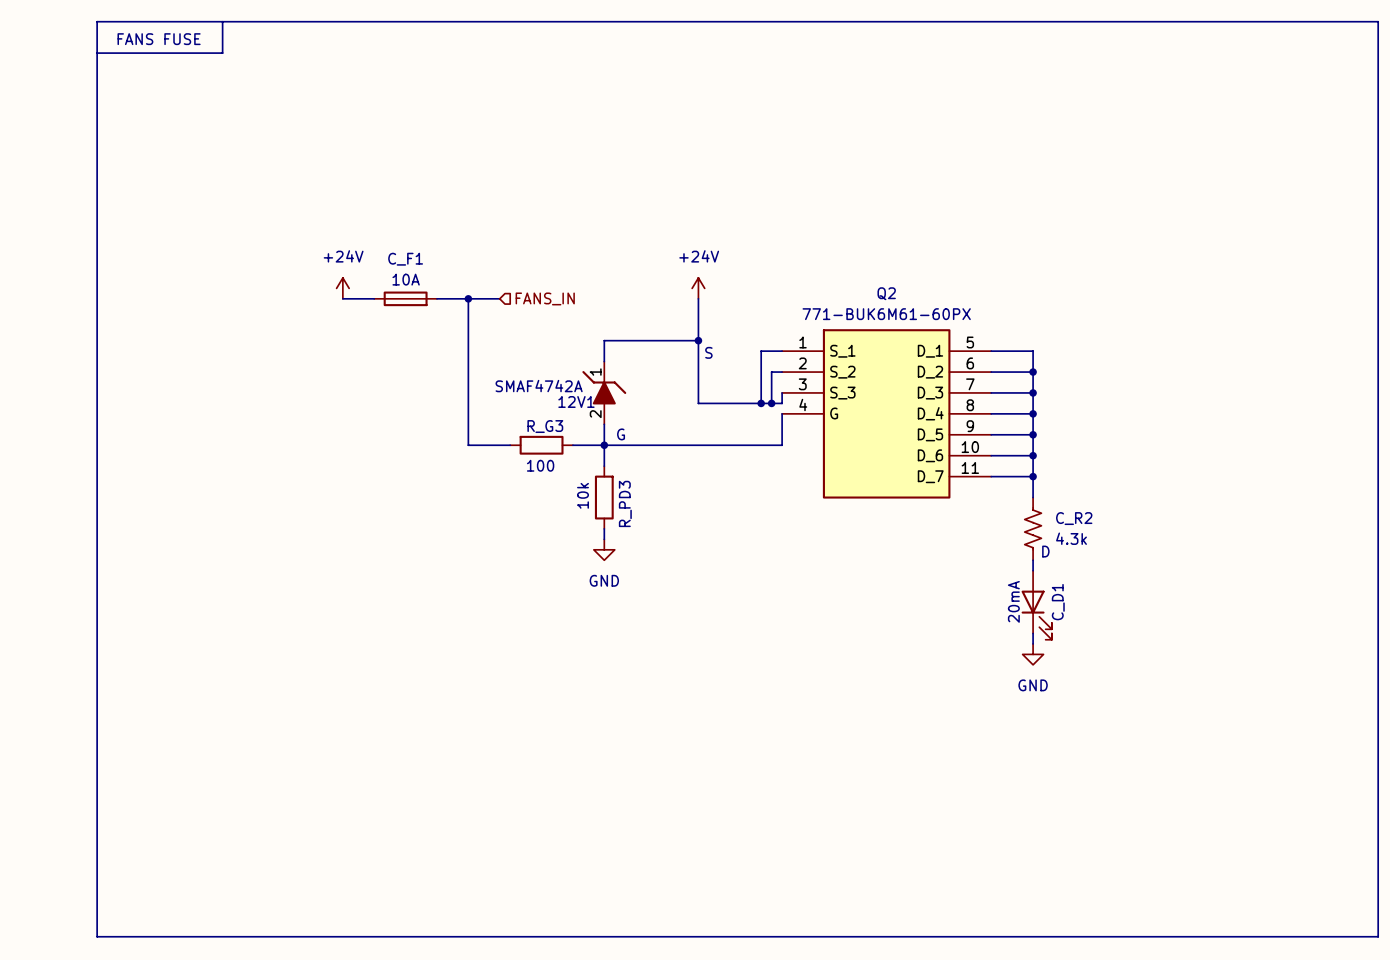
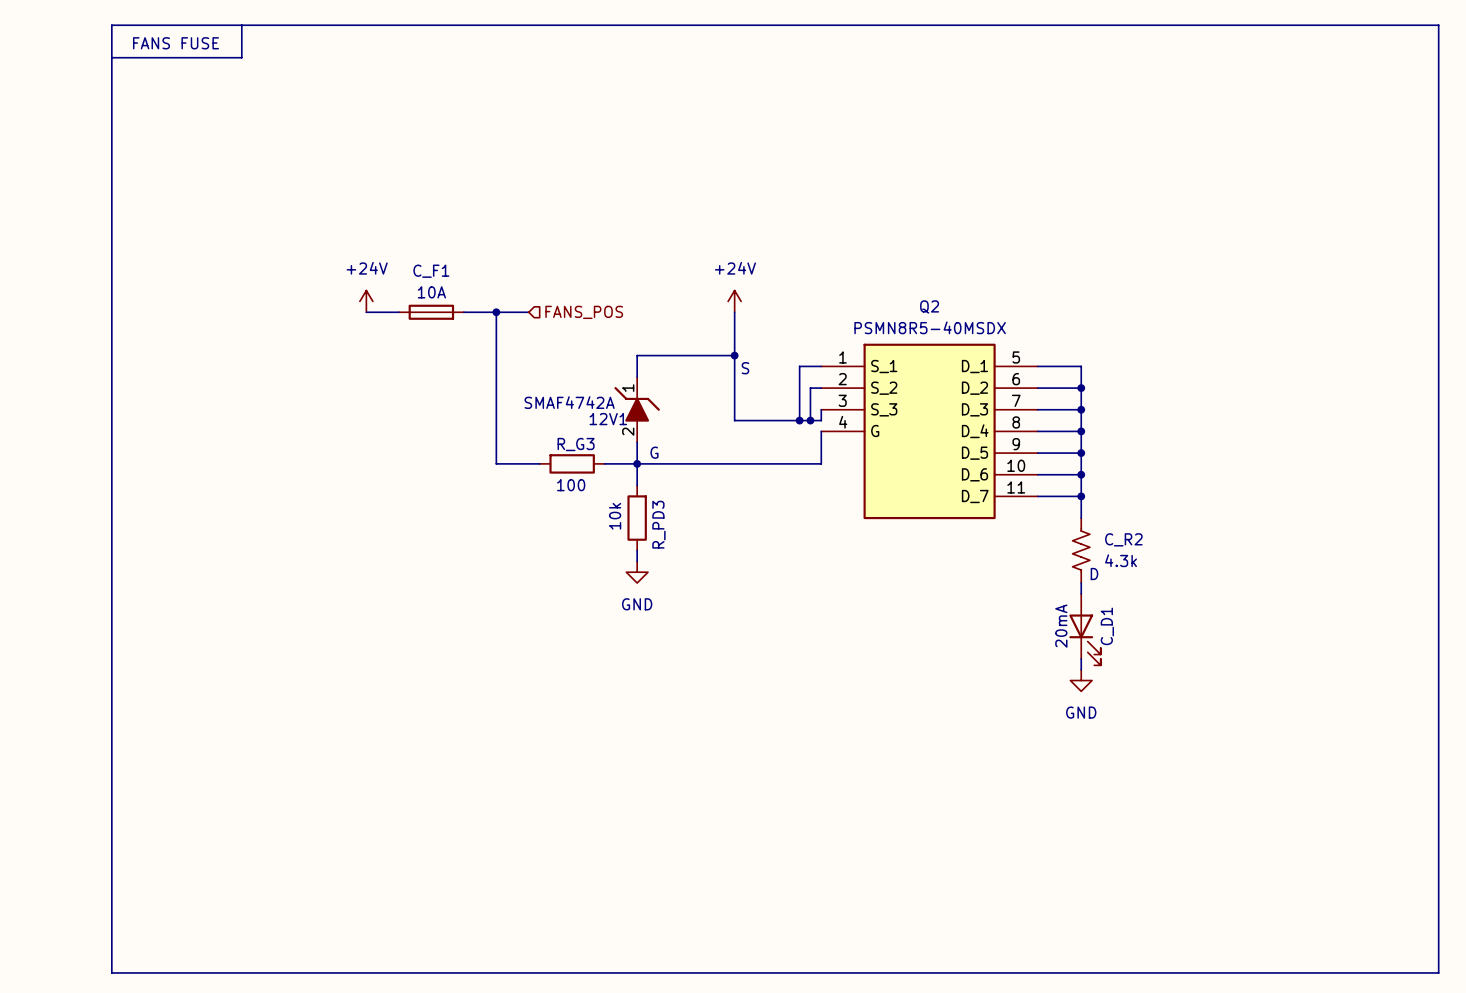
hierarchical label: FANS_IN (545, 298) -> FANS_POS (584, 312)
Q2 value: 771-BUK6M61-60PX (886, 314) -> PSMN8R5-40MSDX (930, 327)

